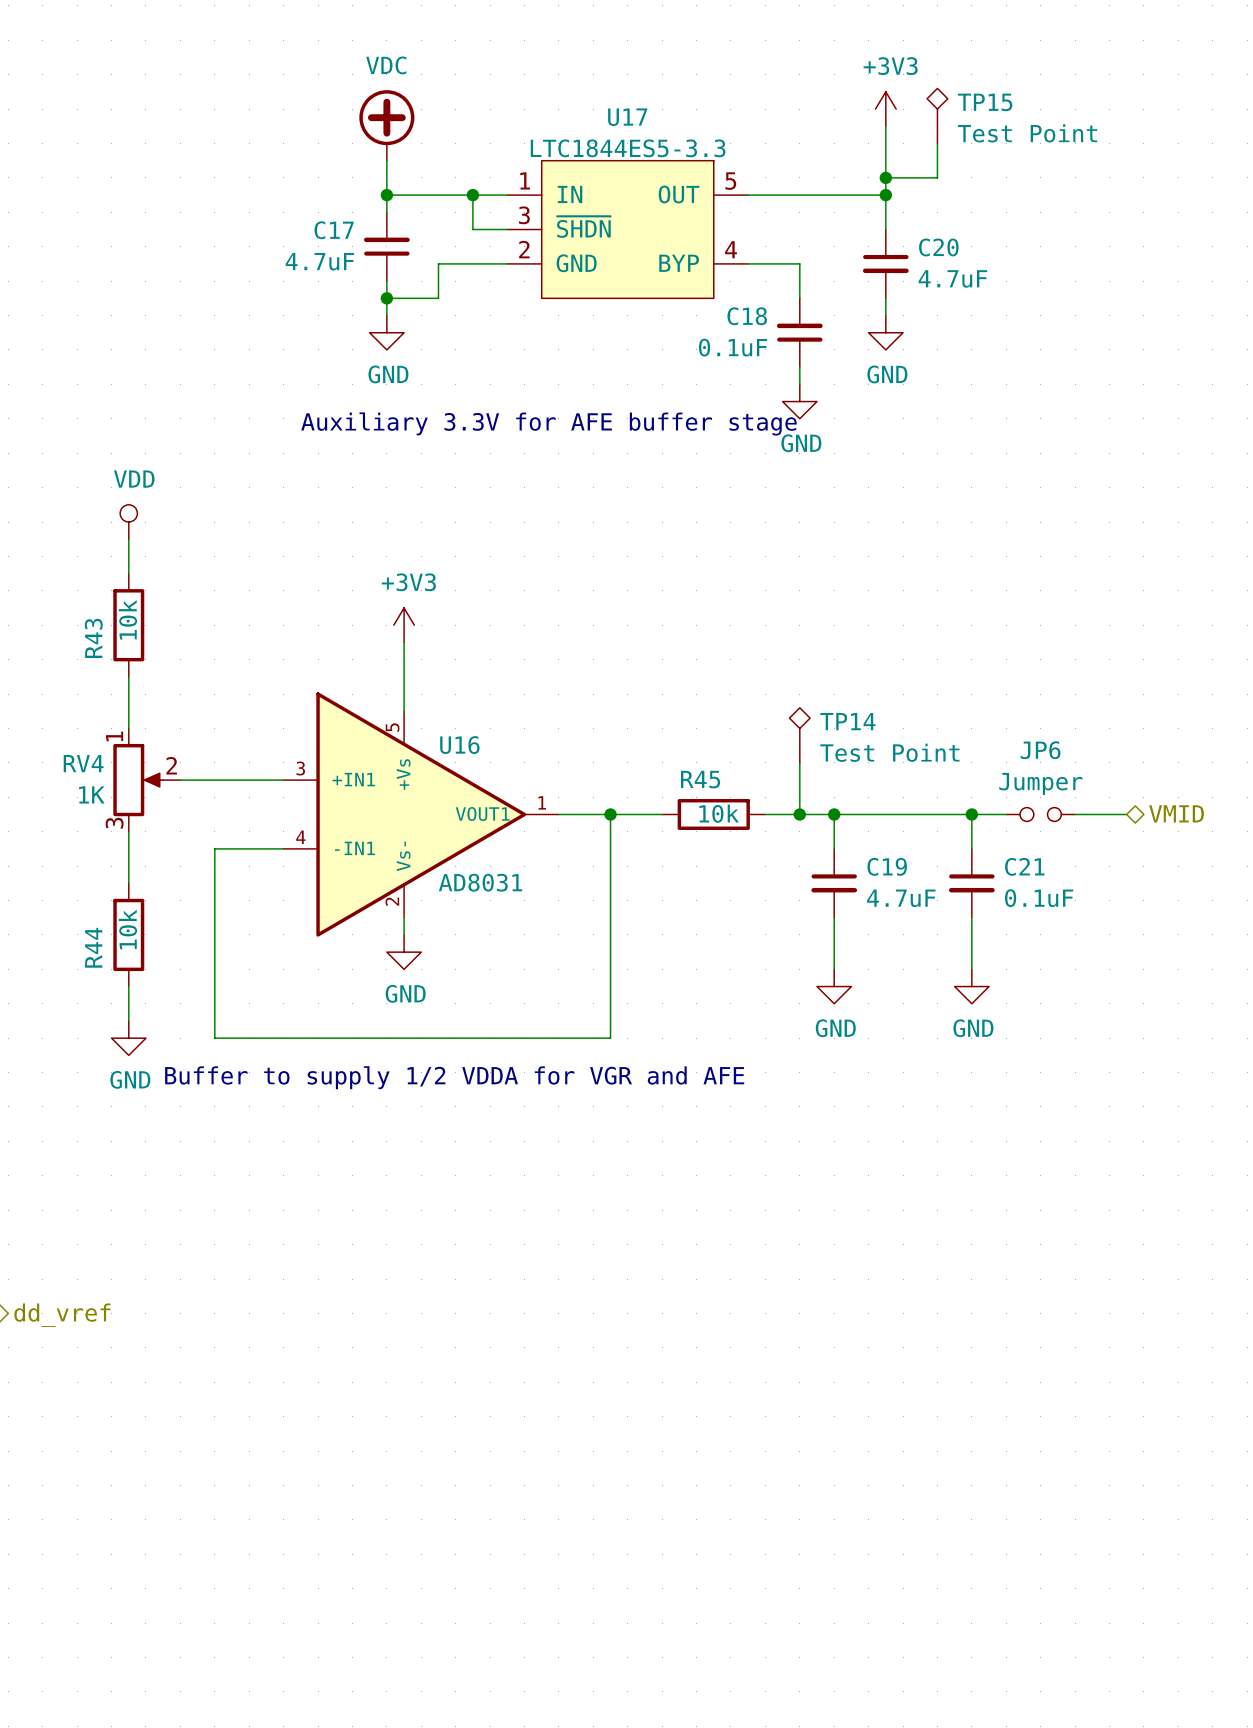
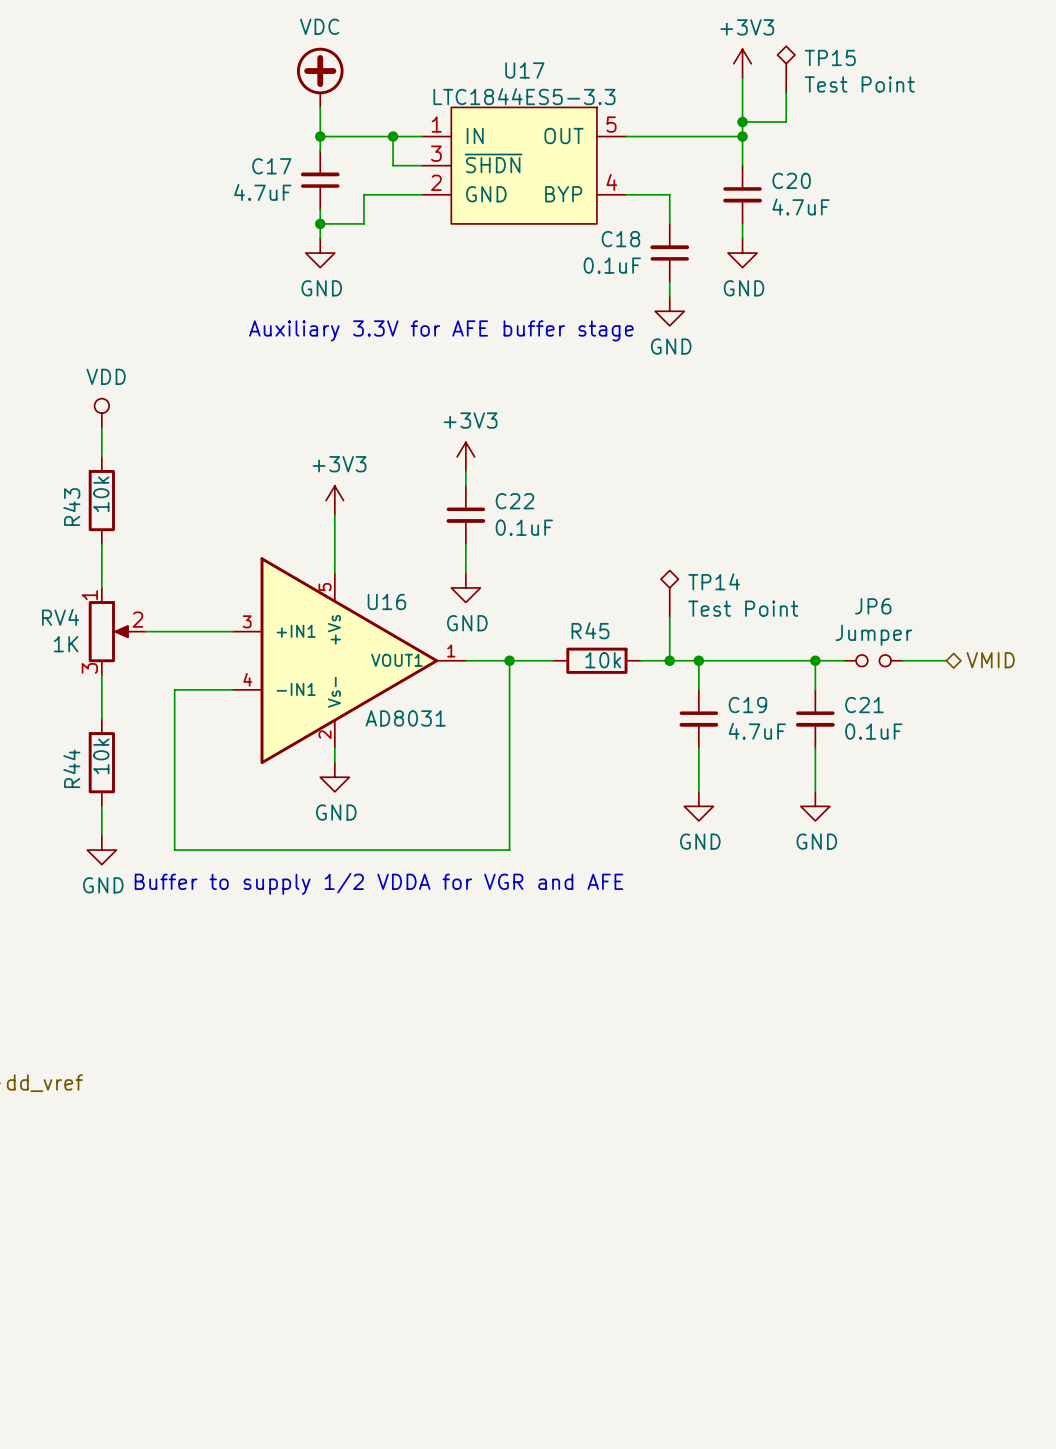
power symbol: none -> +3V3 (465, 456)
wire: none -> (465, 471) (465, 486)
C22: none -> 0.1uF (465, 515)
wire: none -> (465, 544) (465, 573)
power symbol: none -> GND (465, 587)

